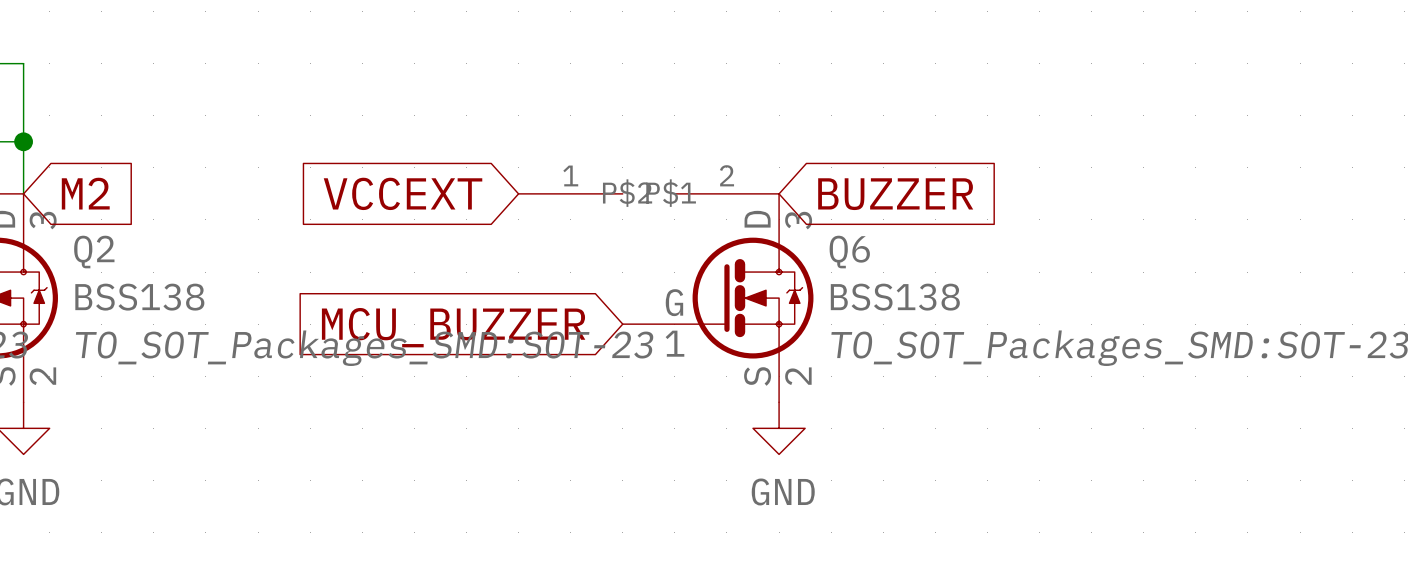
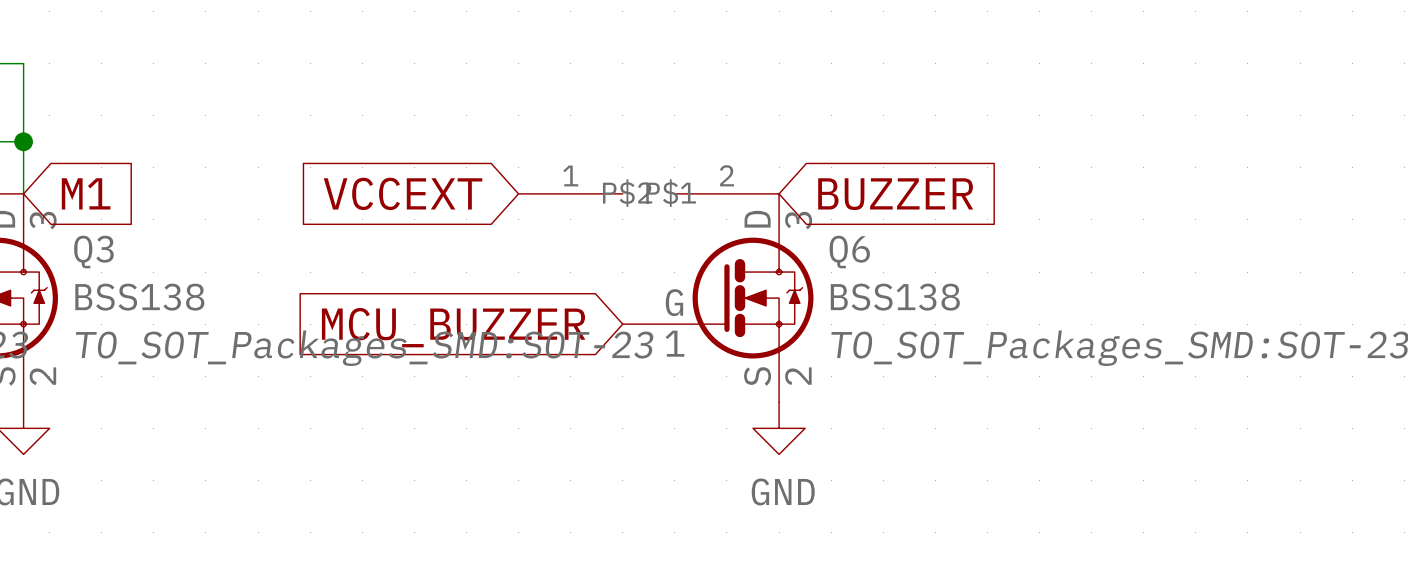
global label: M2 (85, 193) -> M1 (86, 193)
Q2 name: Q2 (94, 252) -> Q3 (93, 252)

